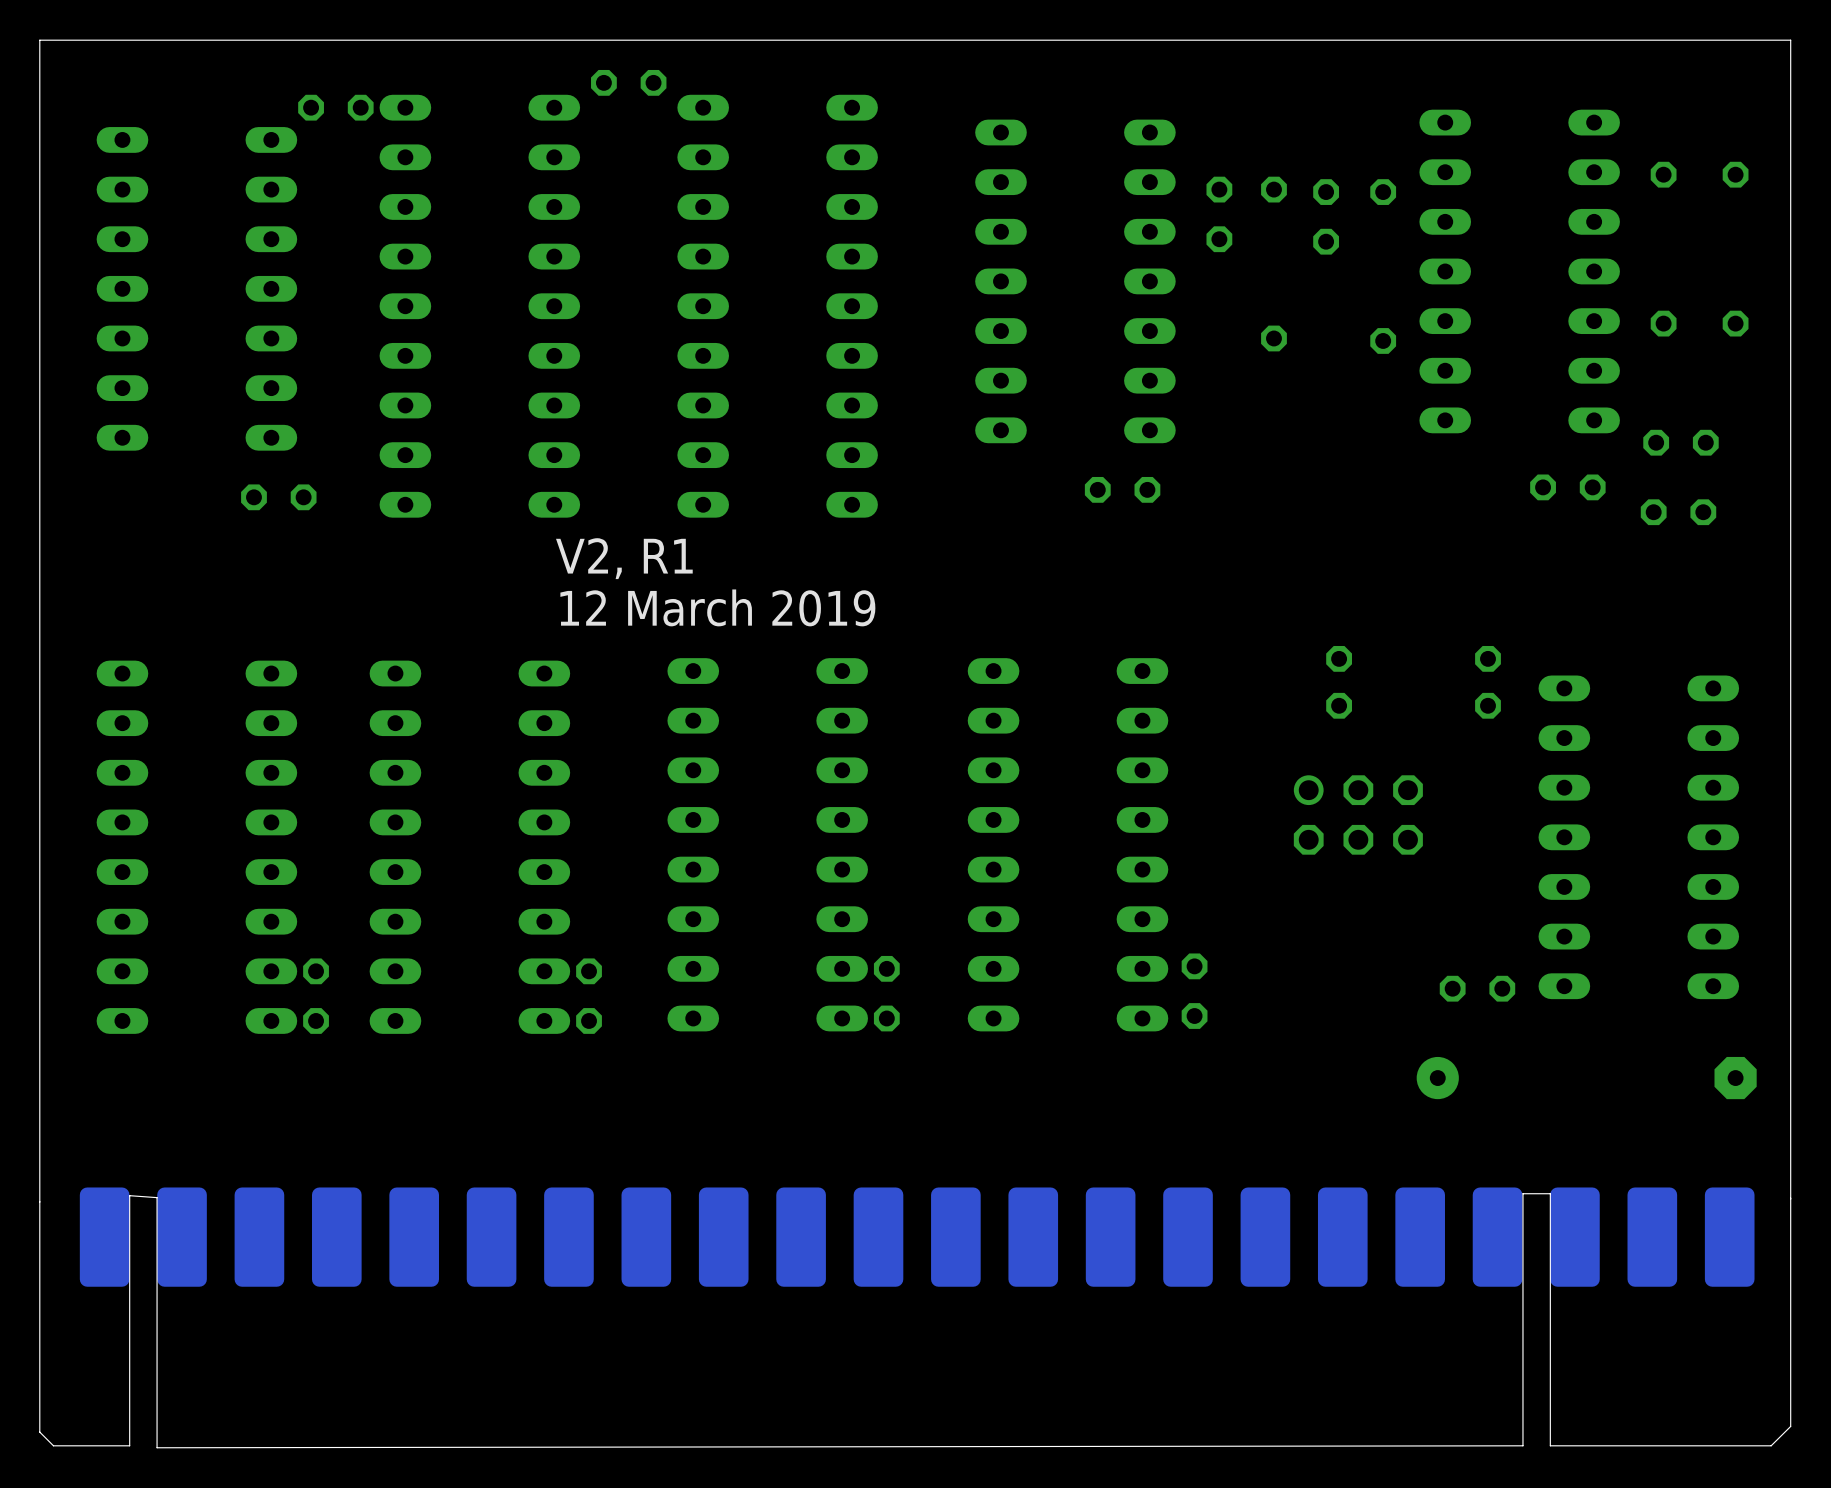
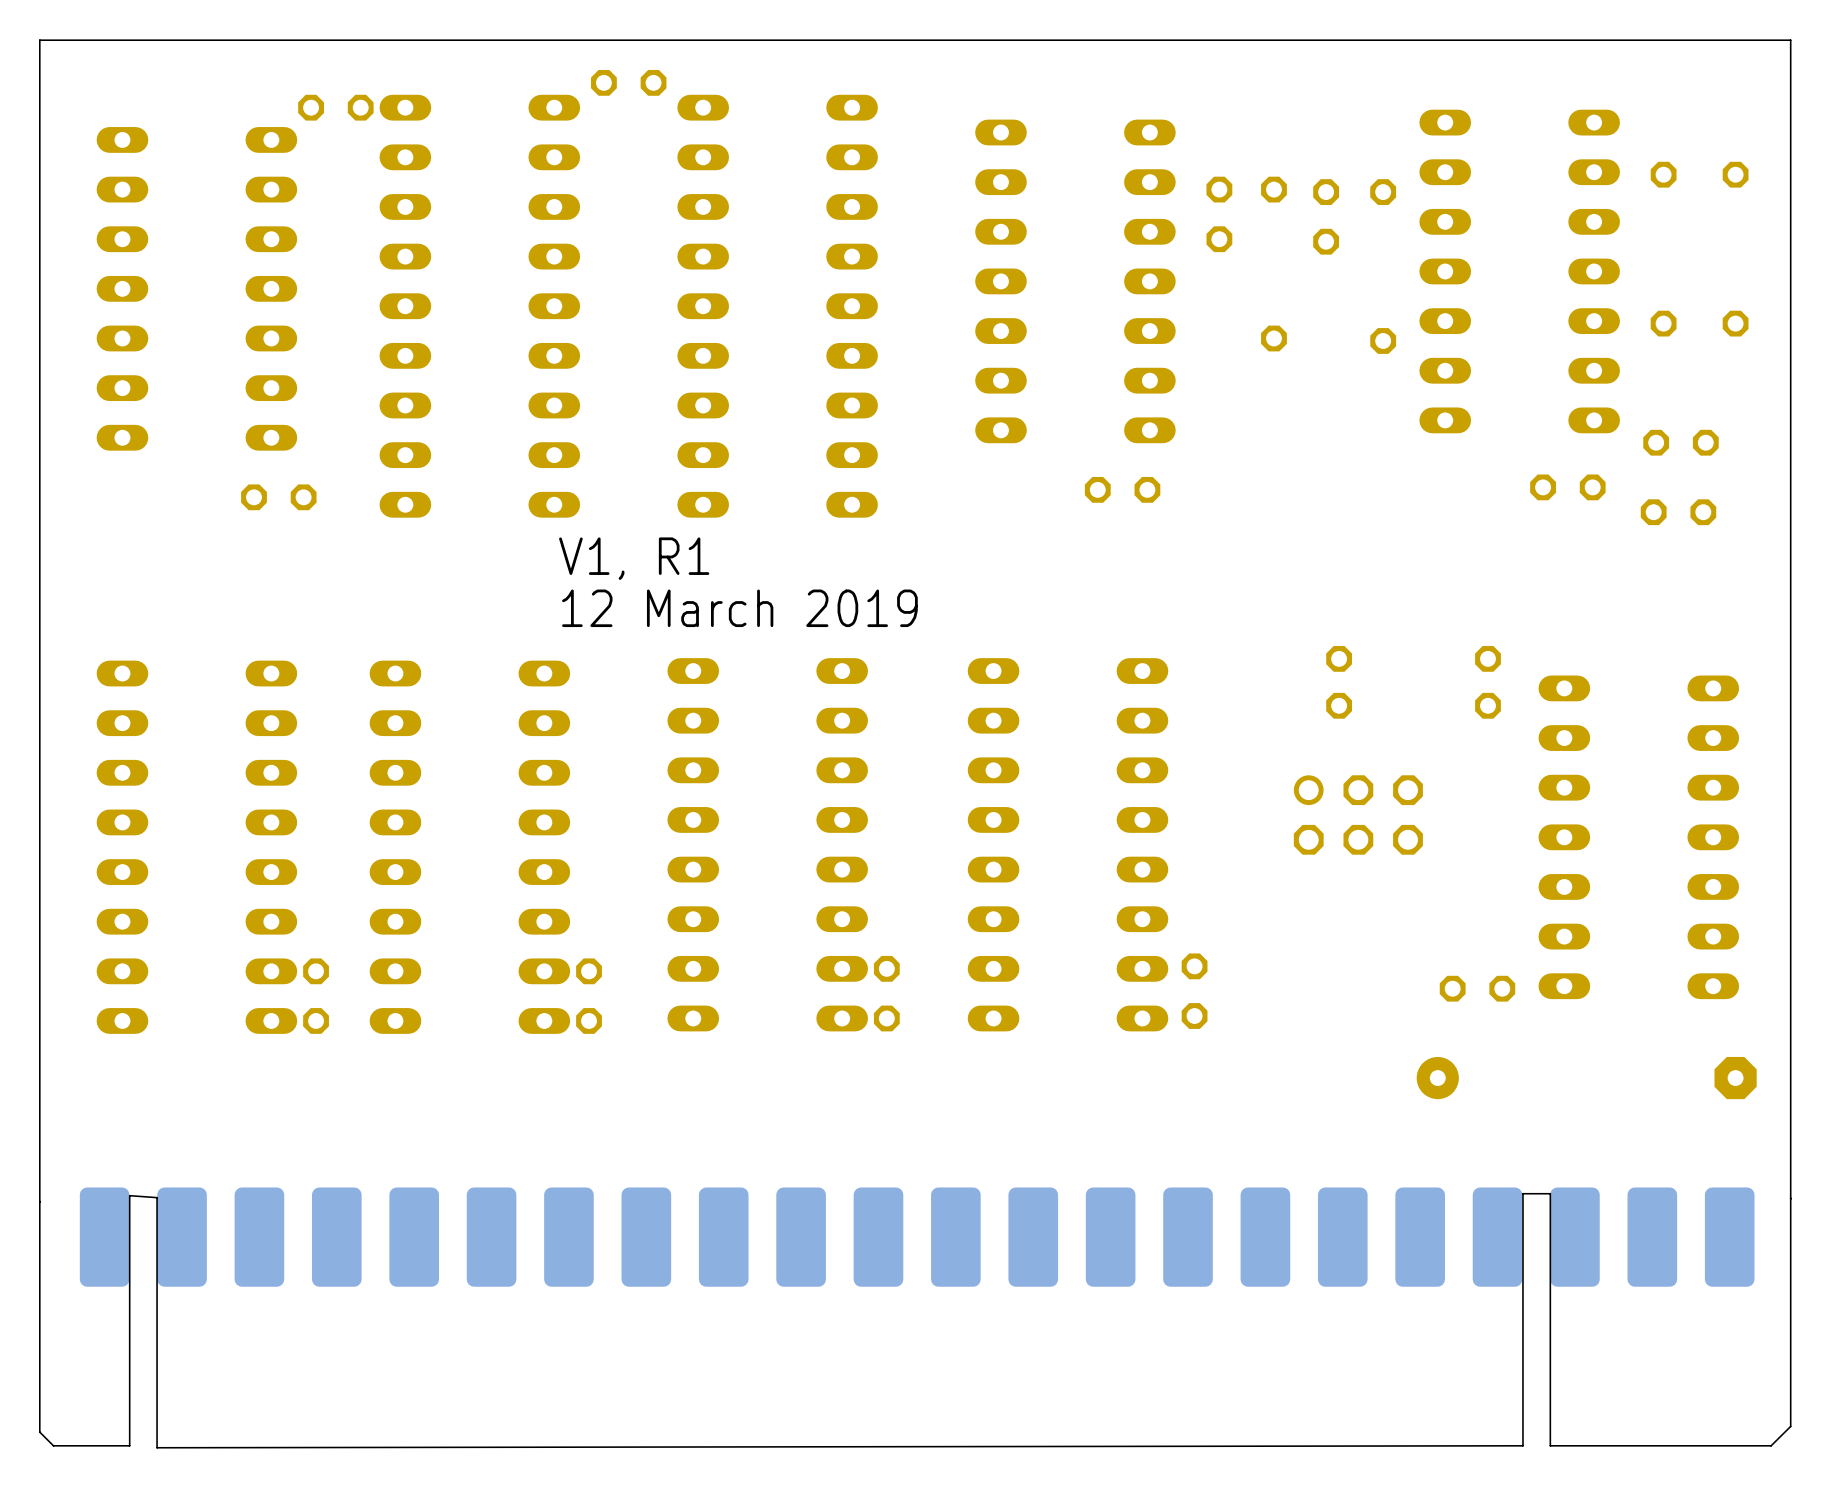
text: V2, R1 (624, 558) -> V1, R1 (634, 558)

